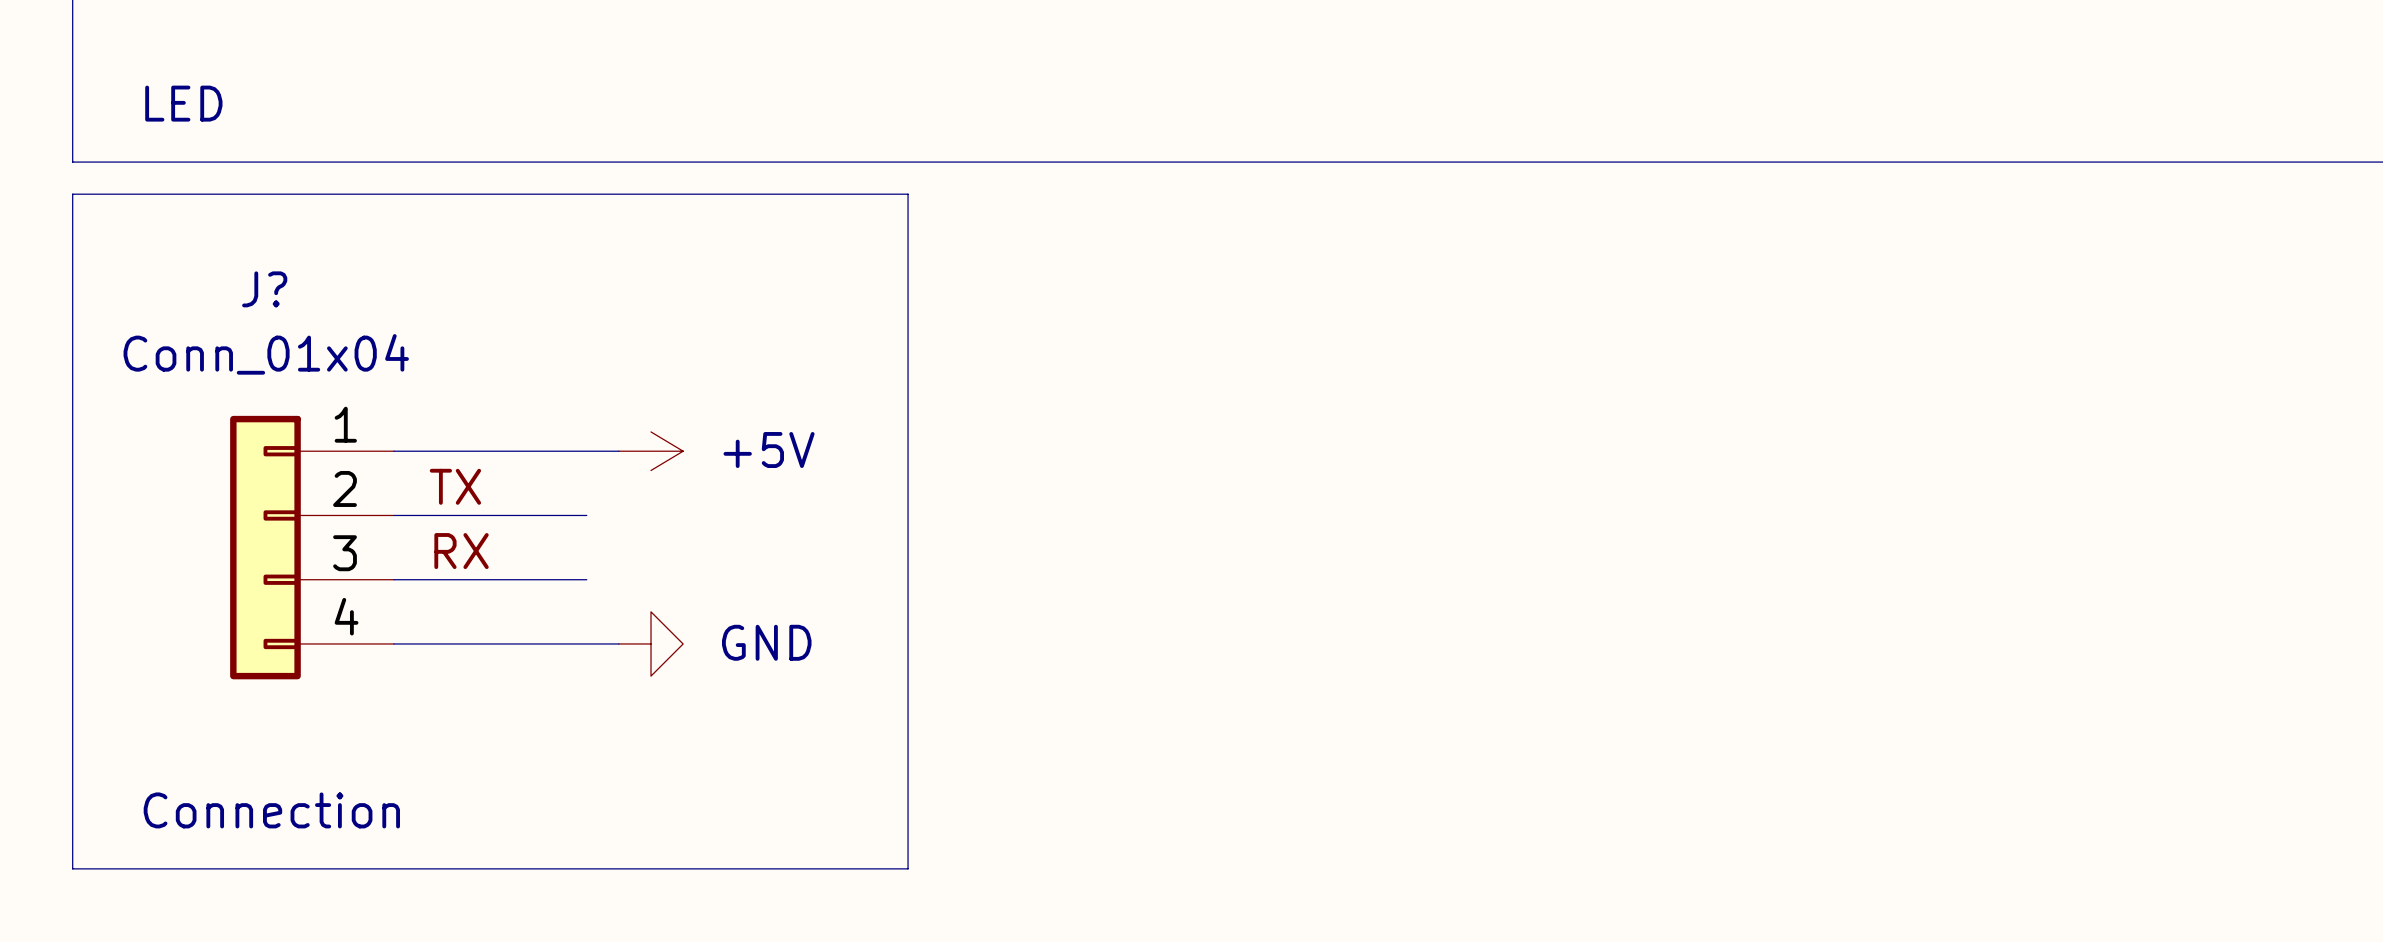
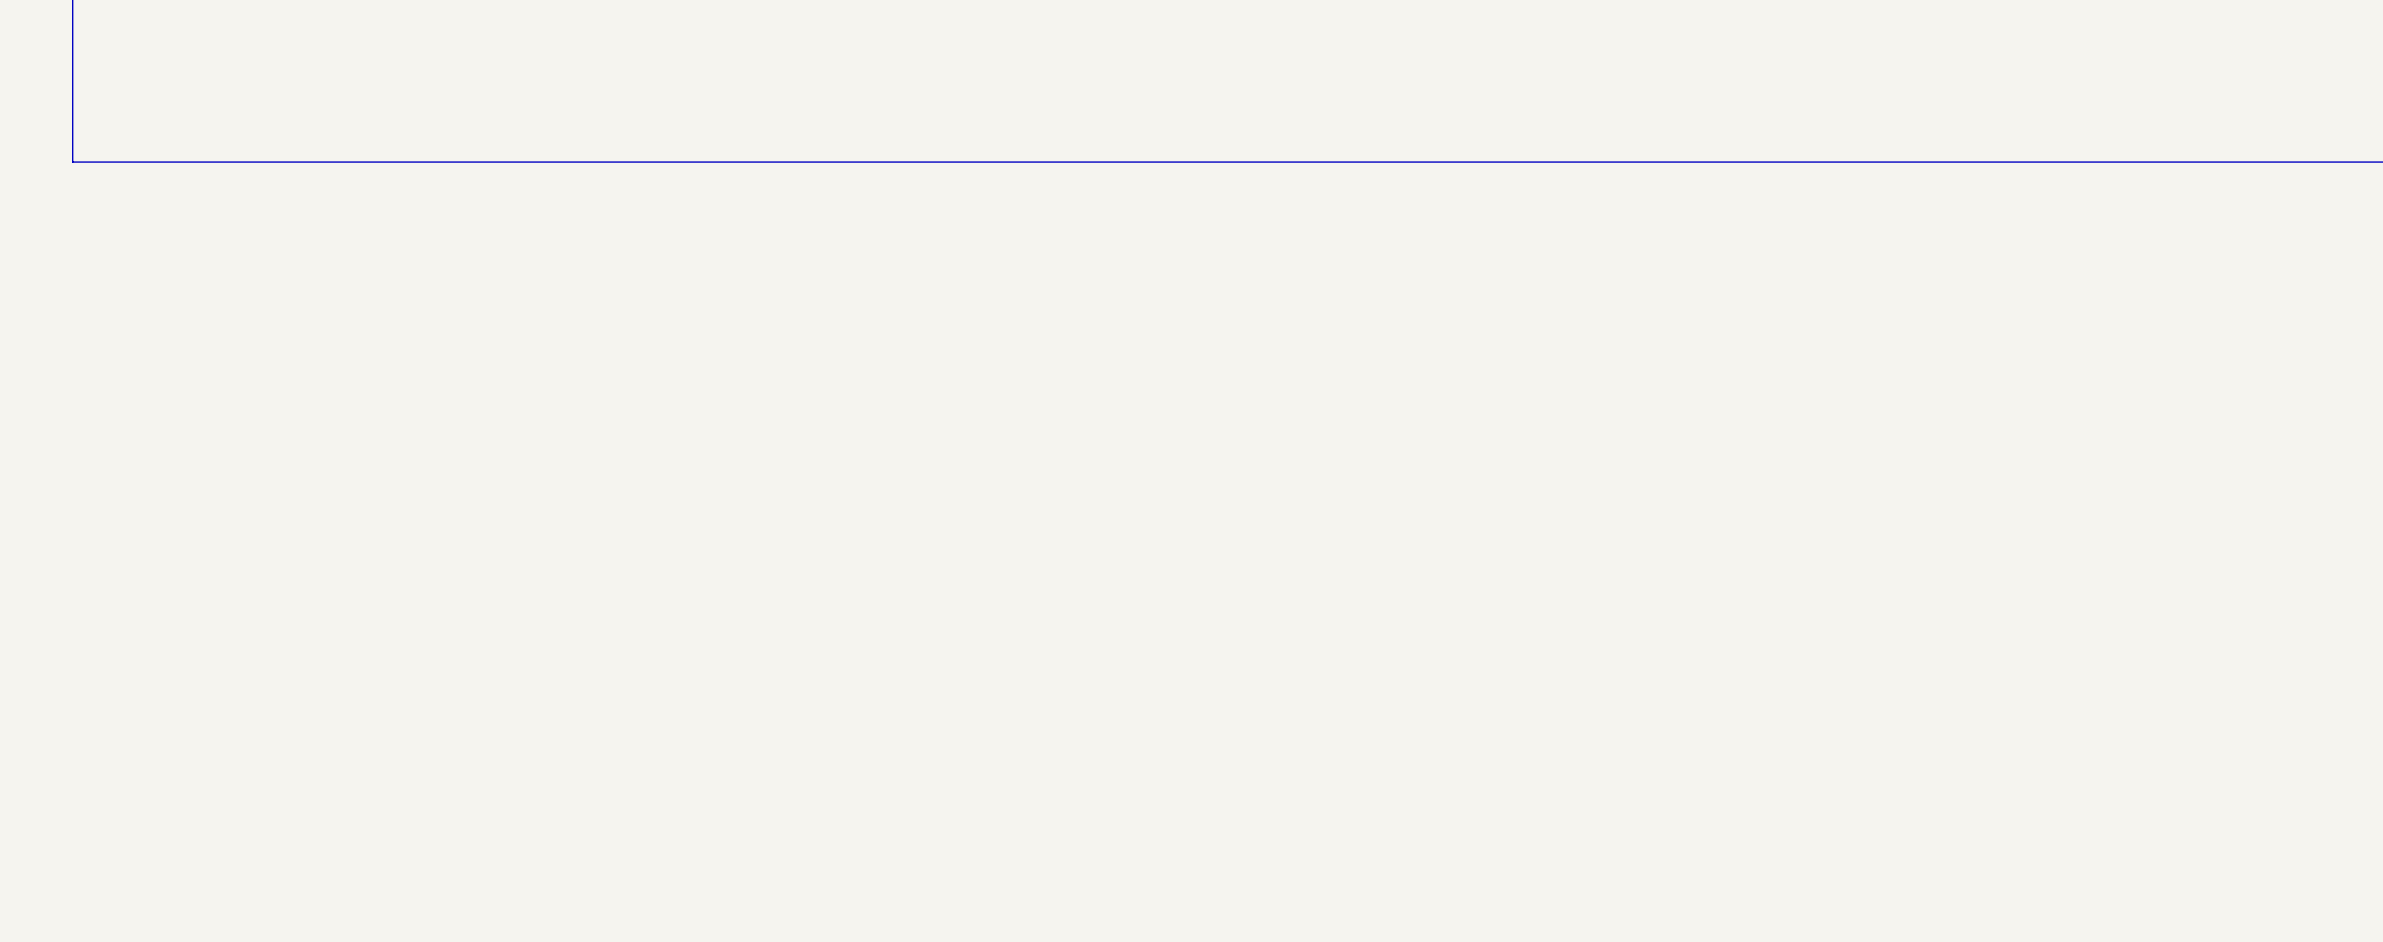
text: LED (183, 103) -> none
line: (72, 194) (908, 194) (908, 868) (72, 868) (72, 194) -> none
wire: (393, 451) (618, 451) -> none
power symbol: +5V (651, 451) -> none
label: TX (455, 486) -> none
wire: (393, 515) (586, 515) -> none
J?: Conn_01x04 (312, 547) -> none
label: RX (461, 551) -> none
wire: (393, 579) (586, 579) -> none
wire: (393, 643) (618, 643) -> none
power symbol: GND (651, 643) -> none
text: Connection (271, 810) -> none

